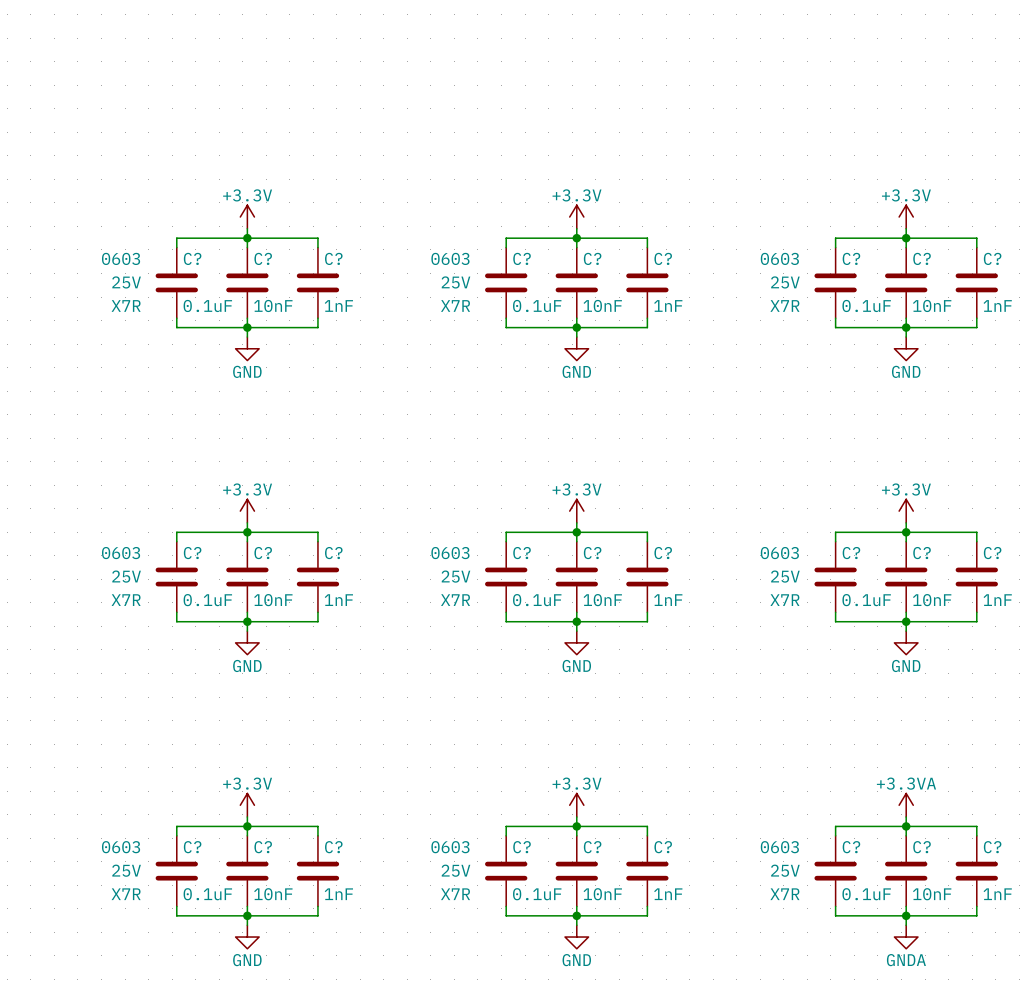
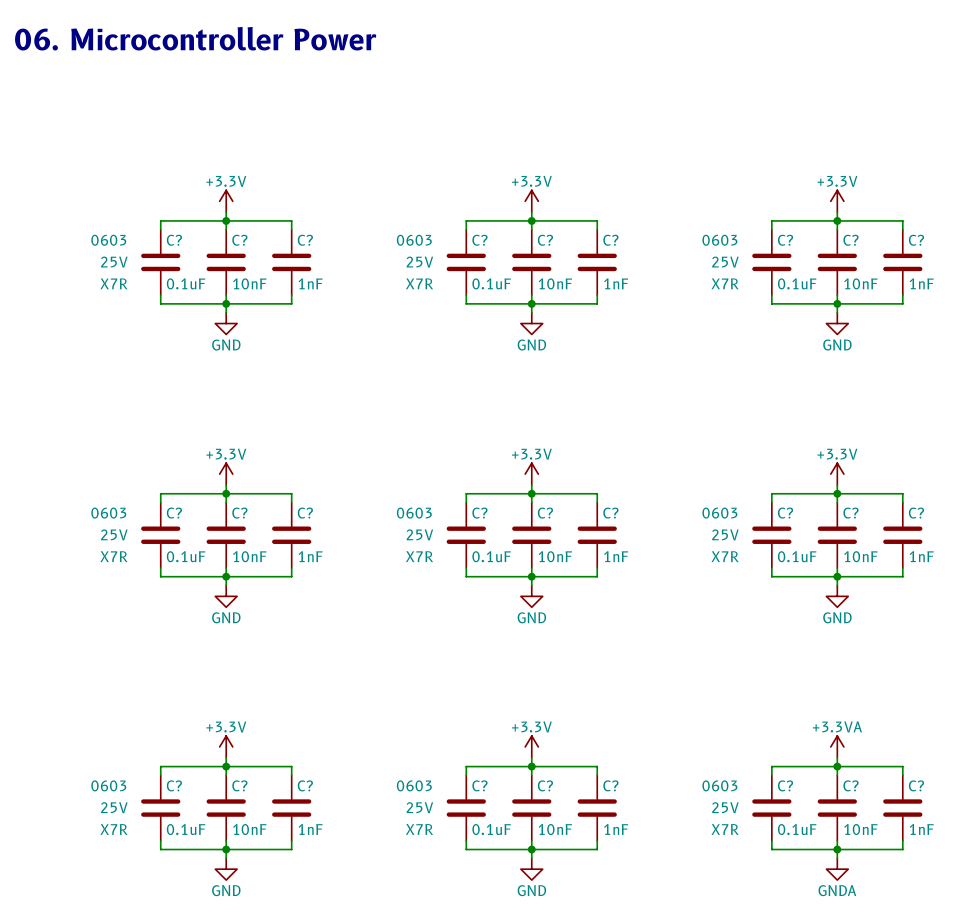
text: none -> 06. Microcontroller Power (195, 38)

